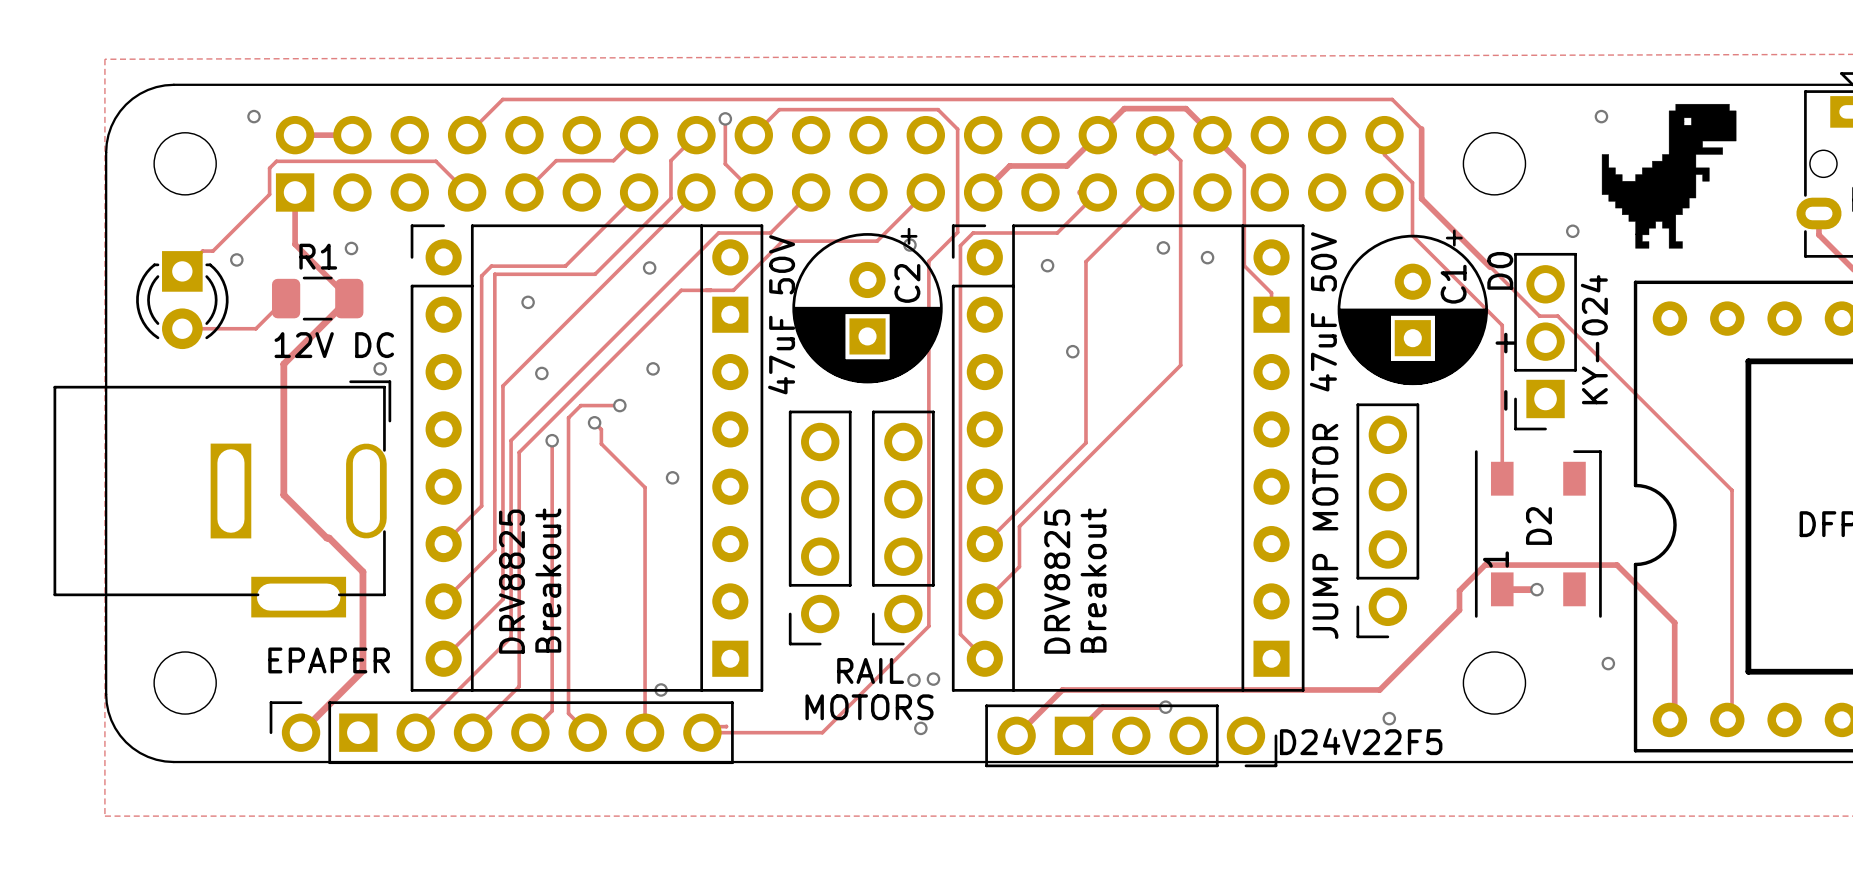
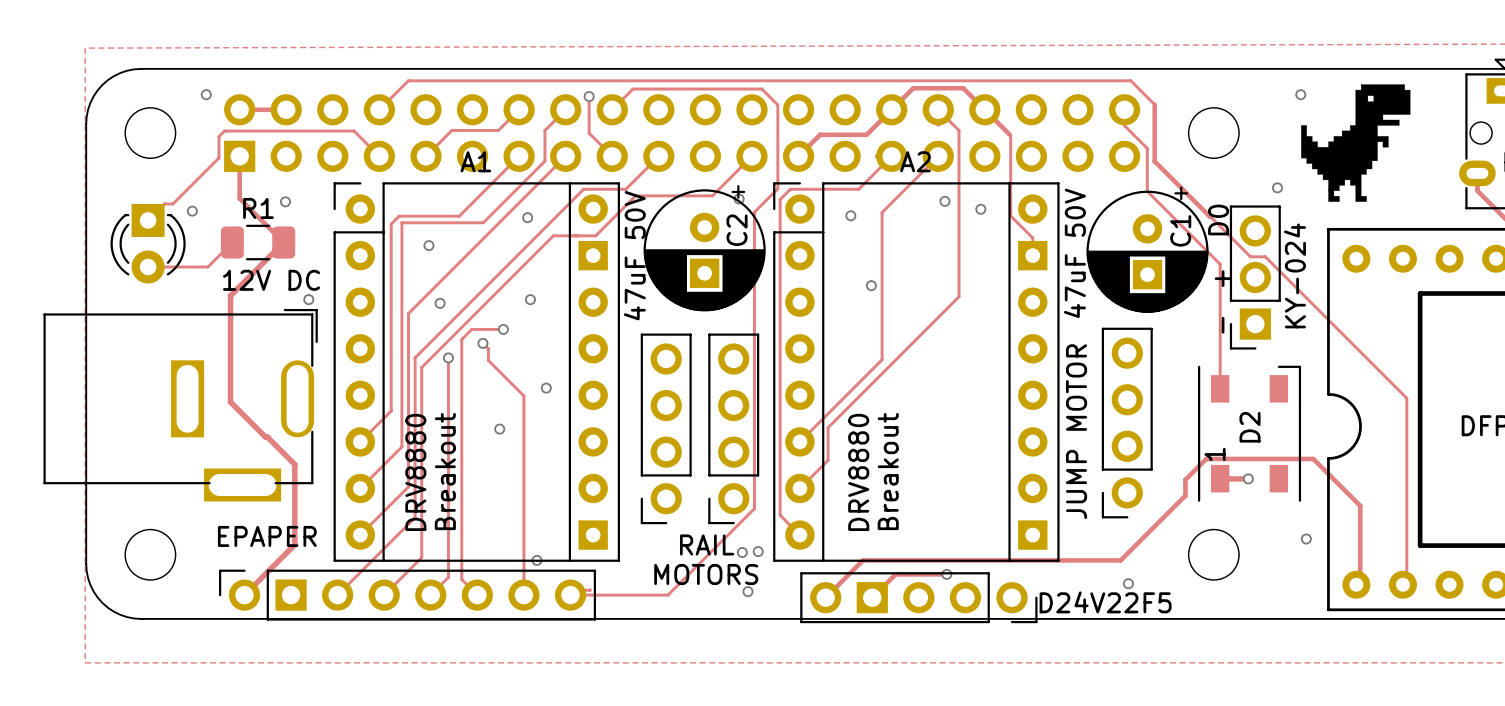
A1 name: none -> A1 (475, 161)
A2 name: none -> A2 (915, 161)
via: none -> (499, 429)
text: DRV8825 (511, 581) -> DRV8880 (415, 472)
text: DRV8825 (1057, 581) -> DRV8880 (858, 472)

